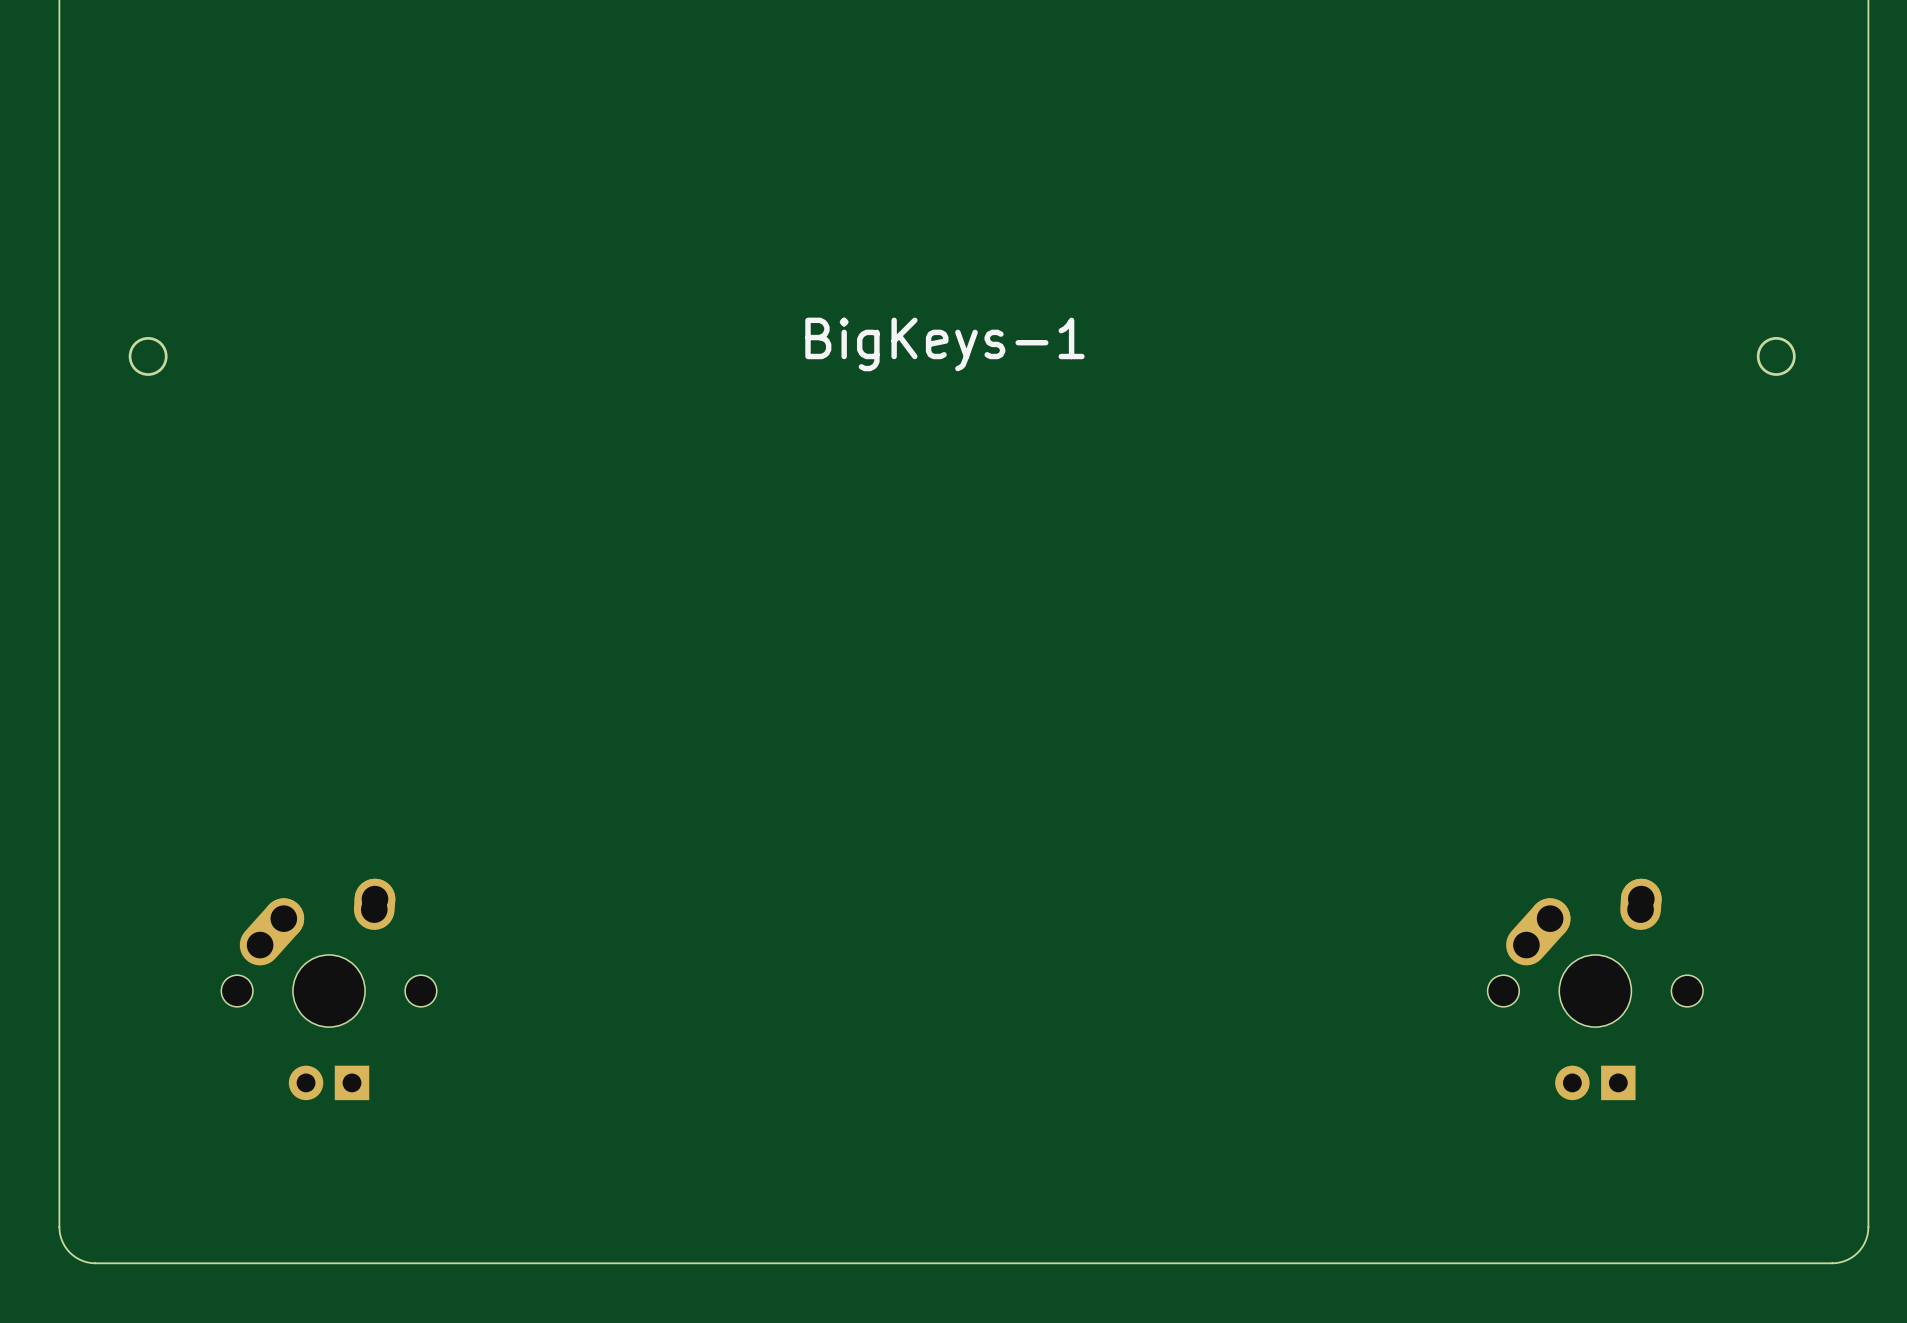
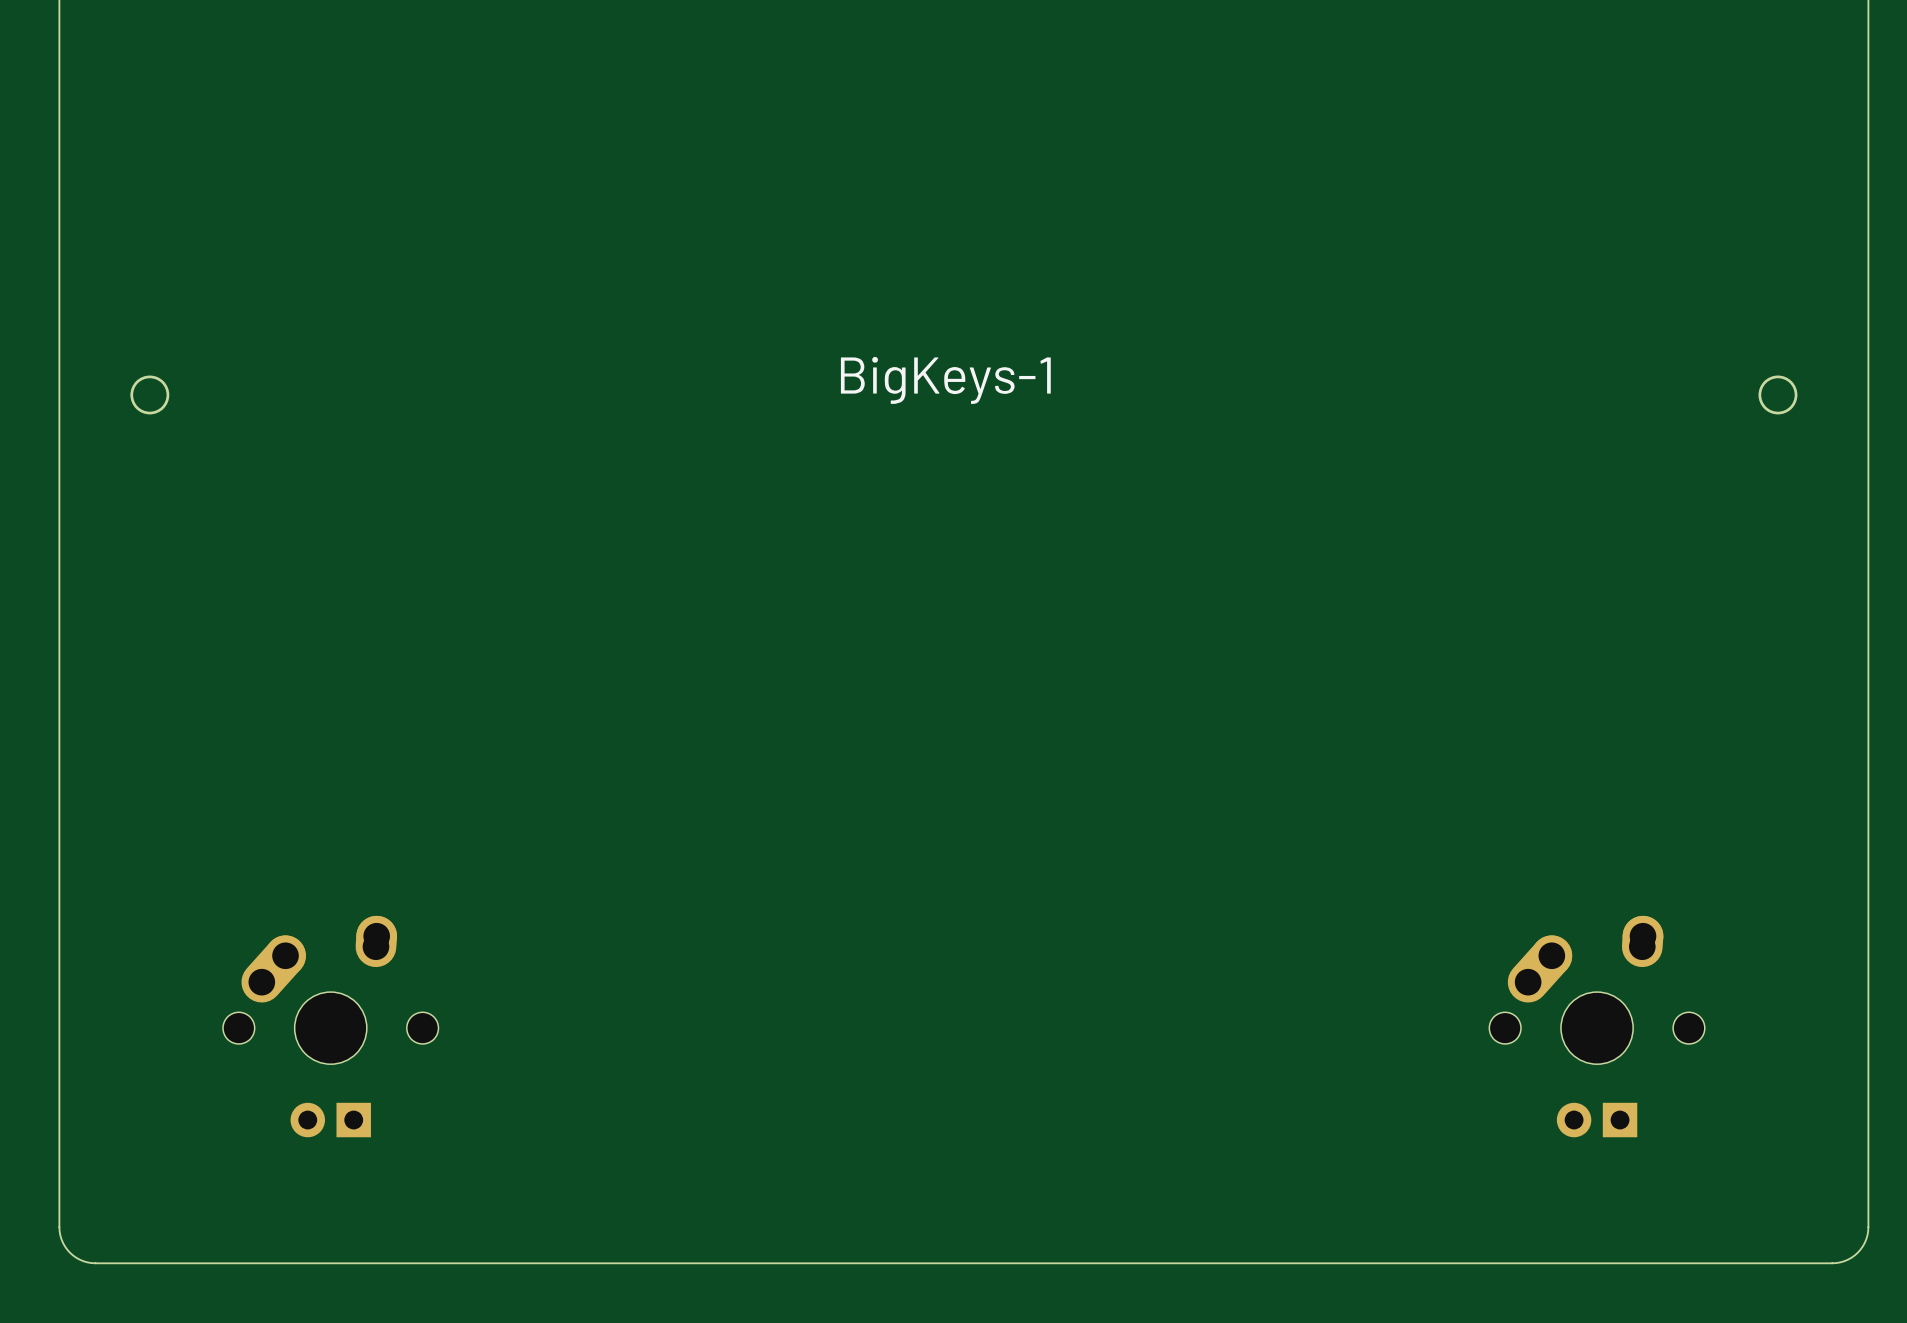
text position: BigKeys-1 (944, 344) -> BigKeys-1 (945, 380)
round board edge position: (148, 356) -> (149, 394)
round board edge position: (1776, 356) -> (1777, 394)
part position: (329, 989) -> (330, 1026)
part position: (1595, 989) -> (1597, 1026)

